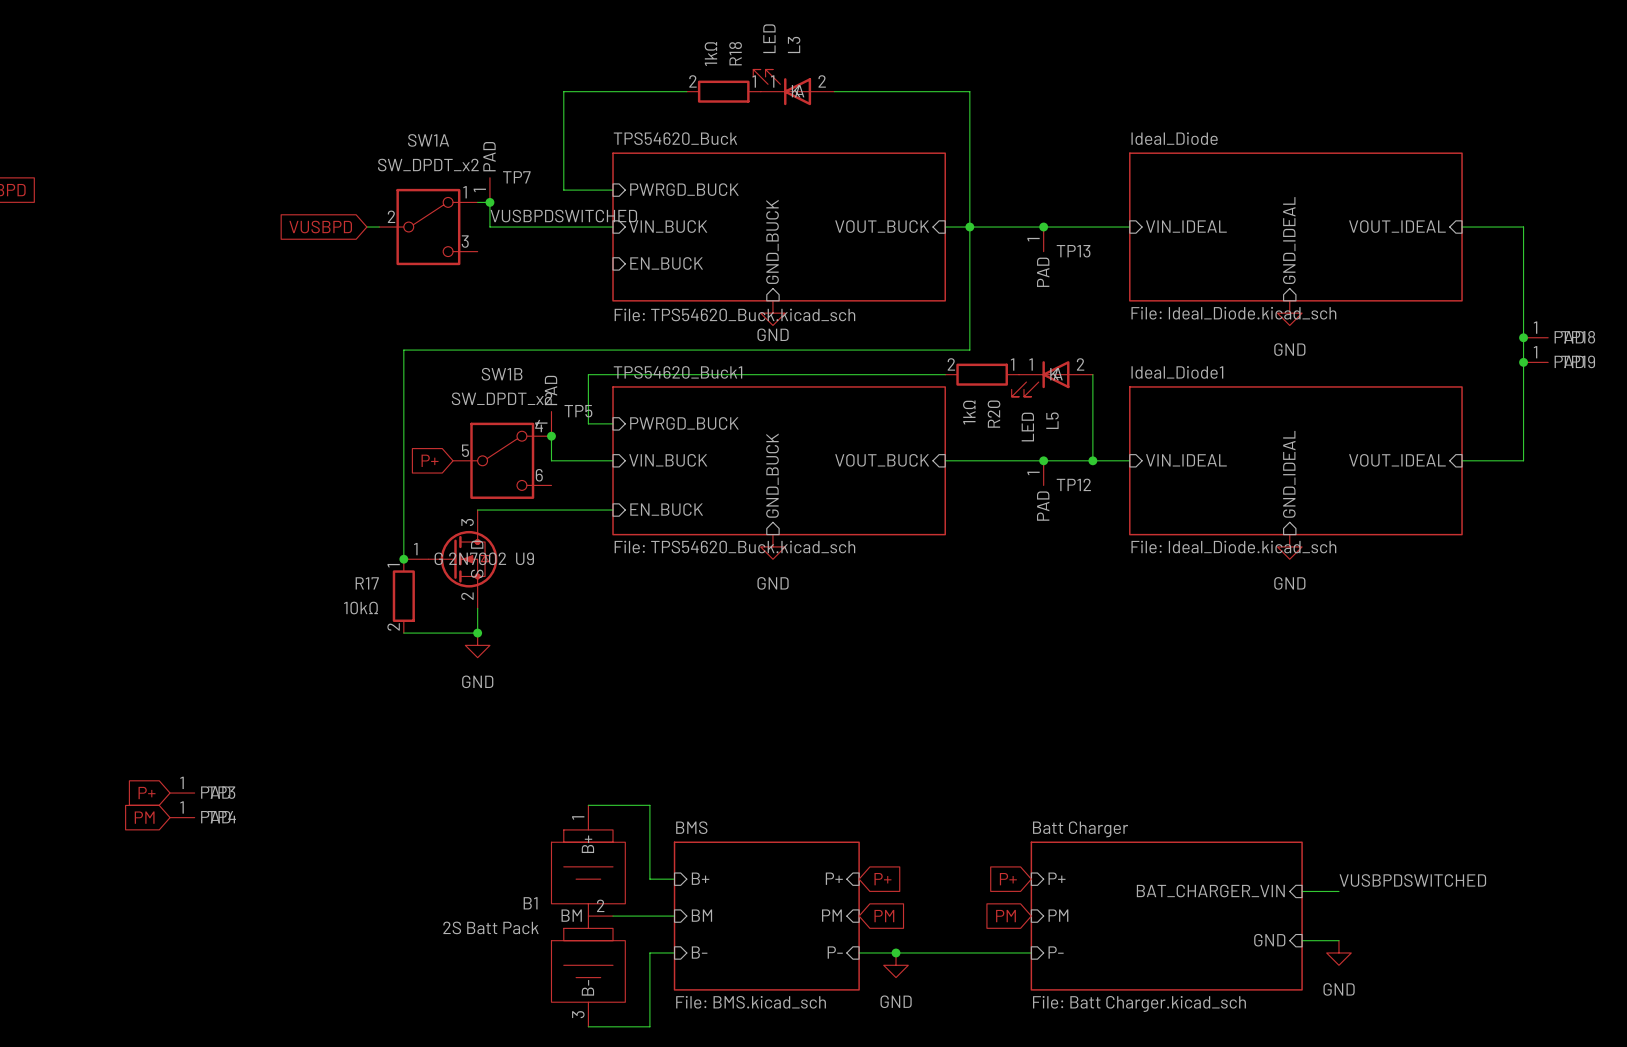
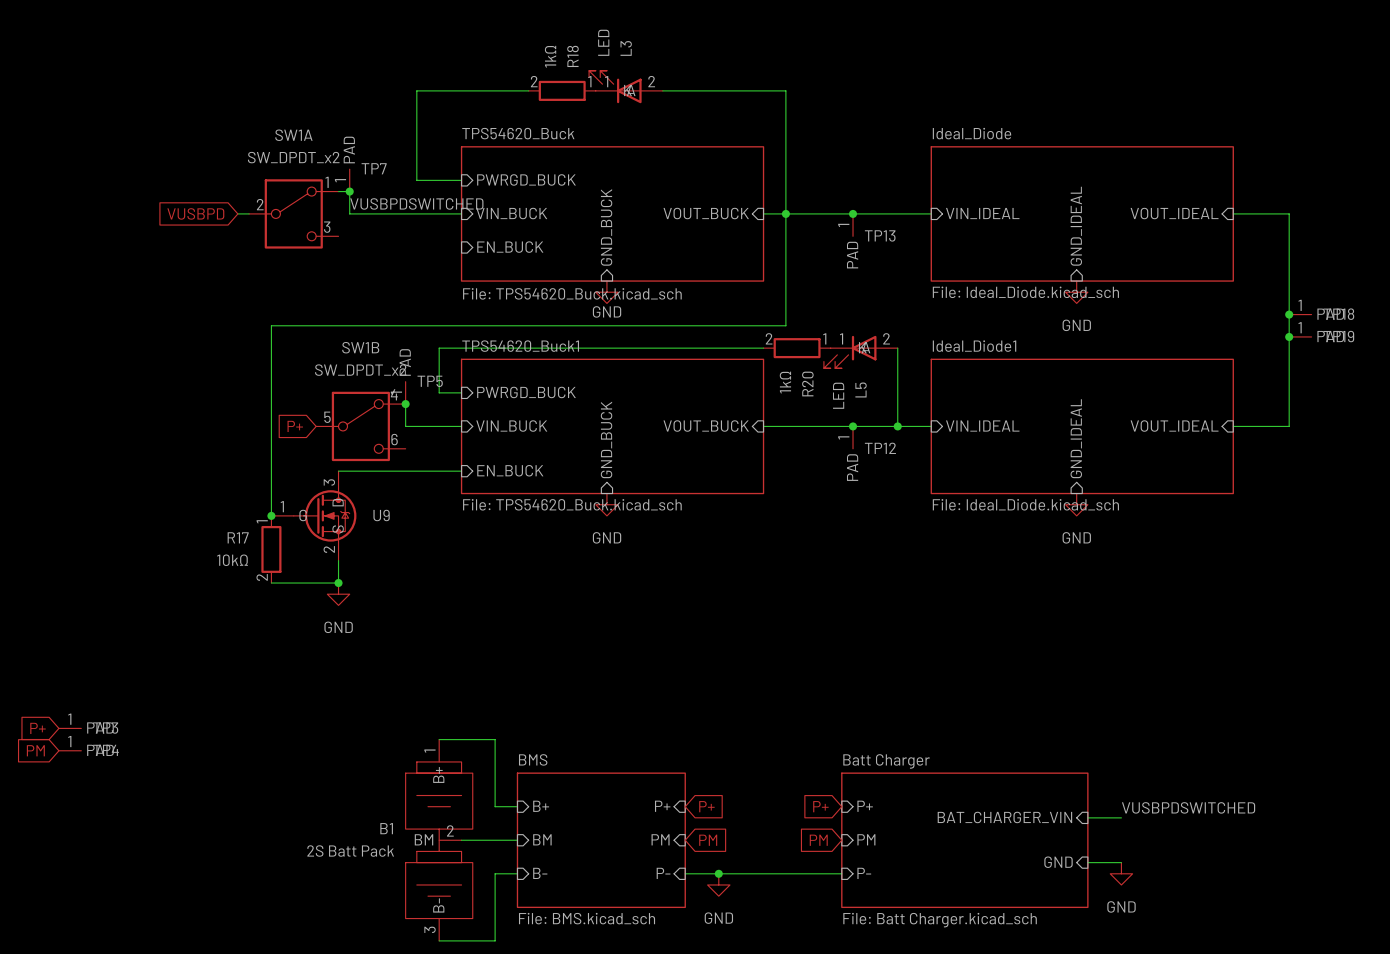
U9 value: 2N7002 (477, 558) -> none

